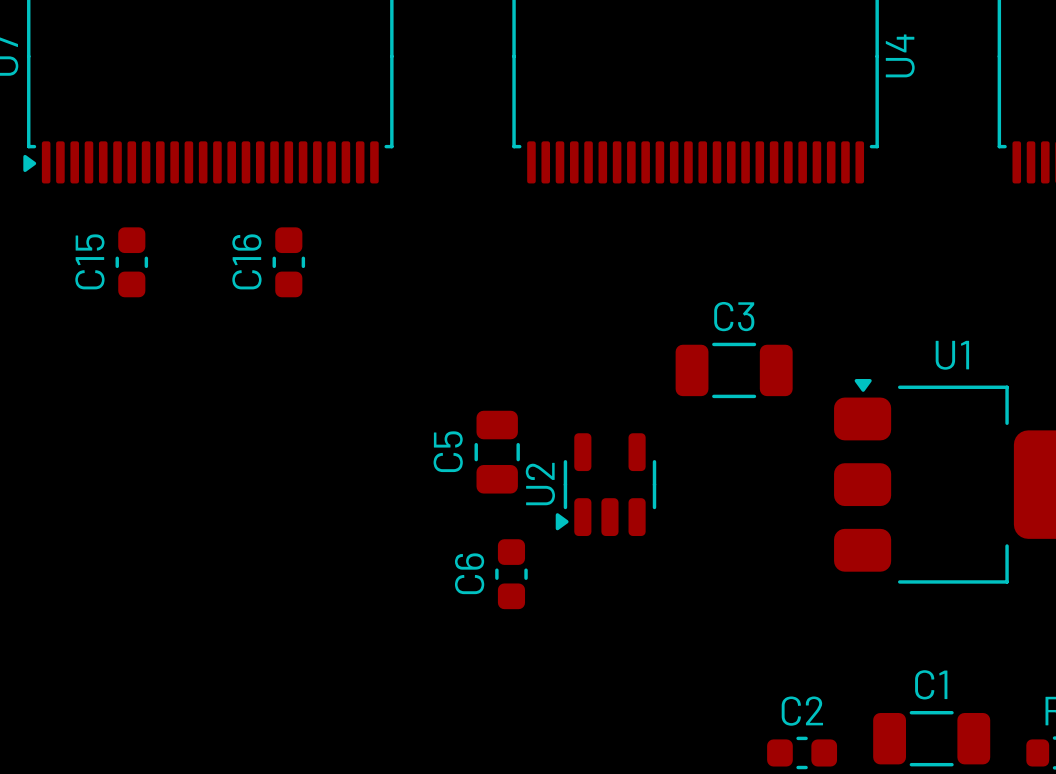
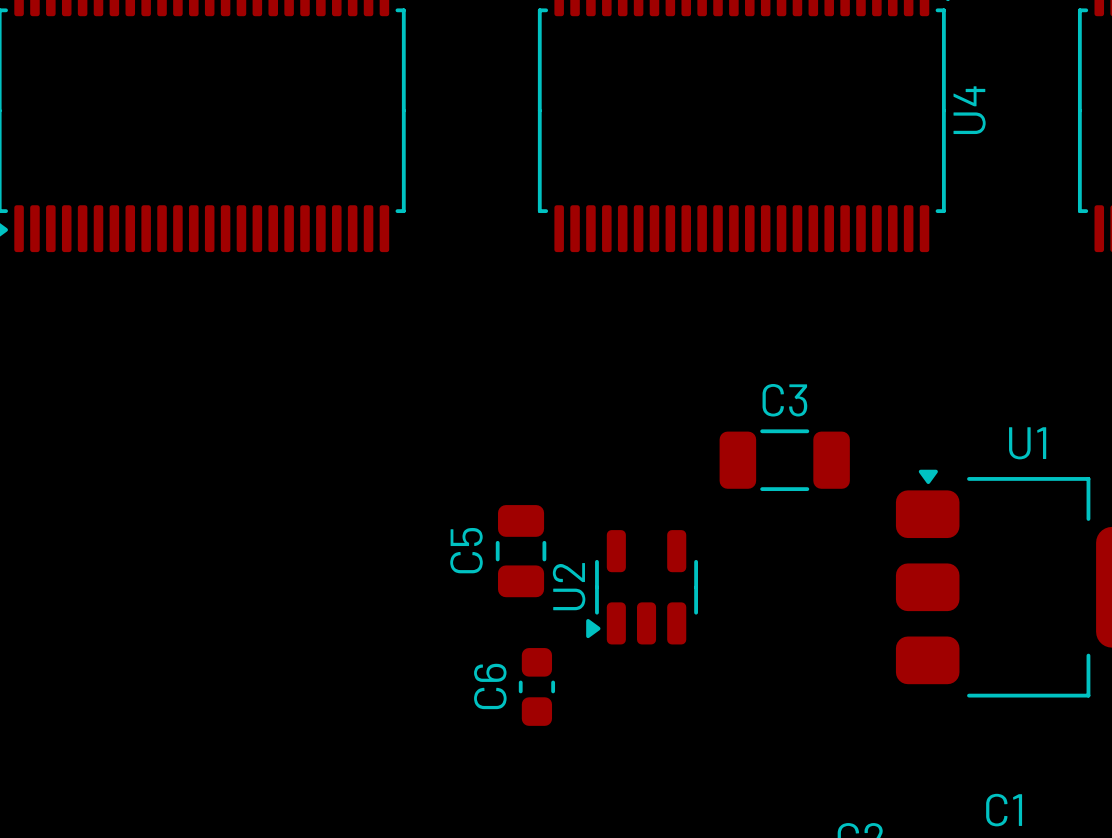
C15: (131, 262) -> none
C16: (288, 262) -> none

